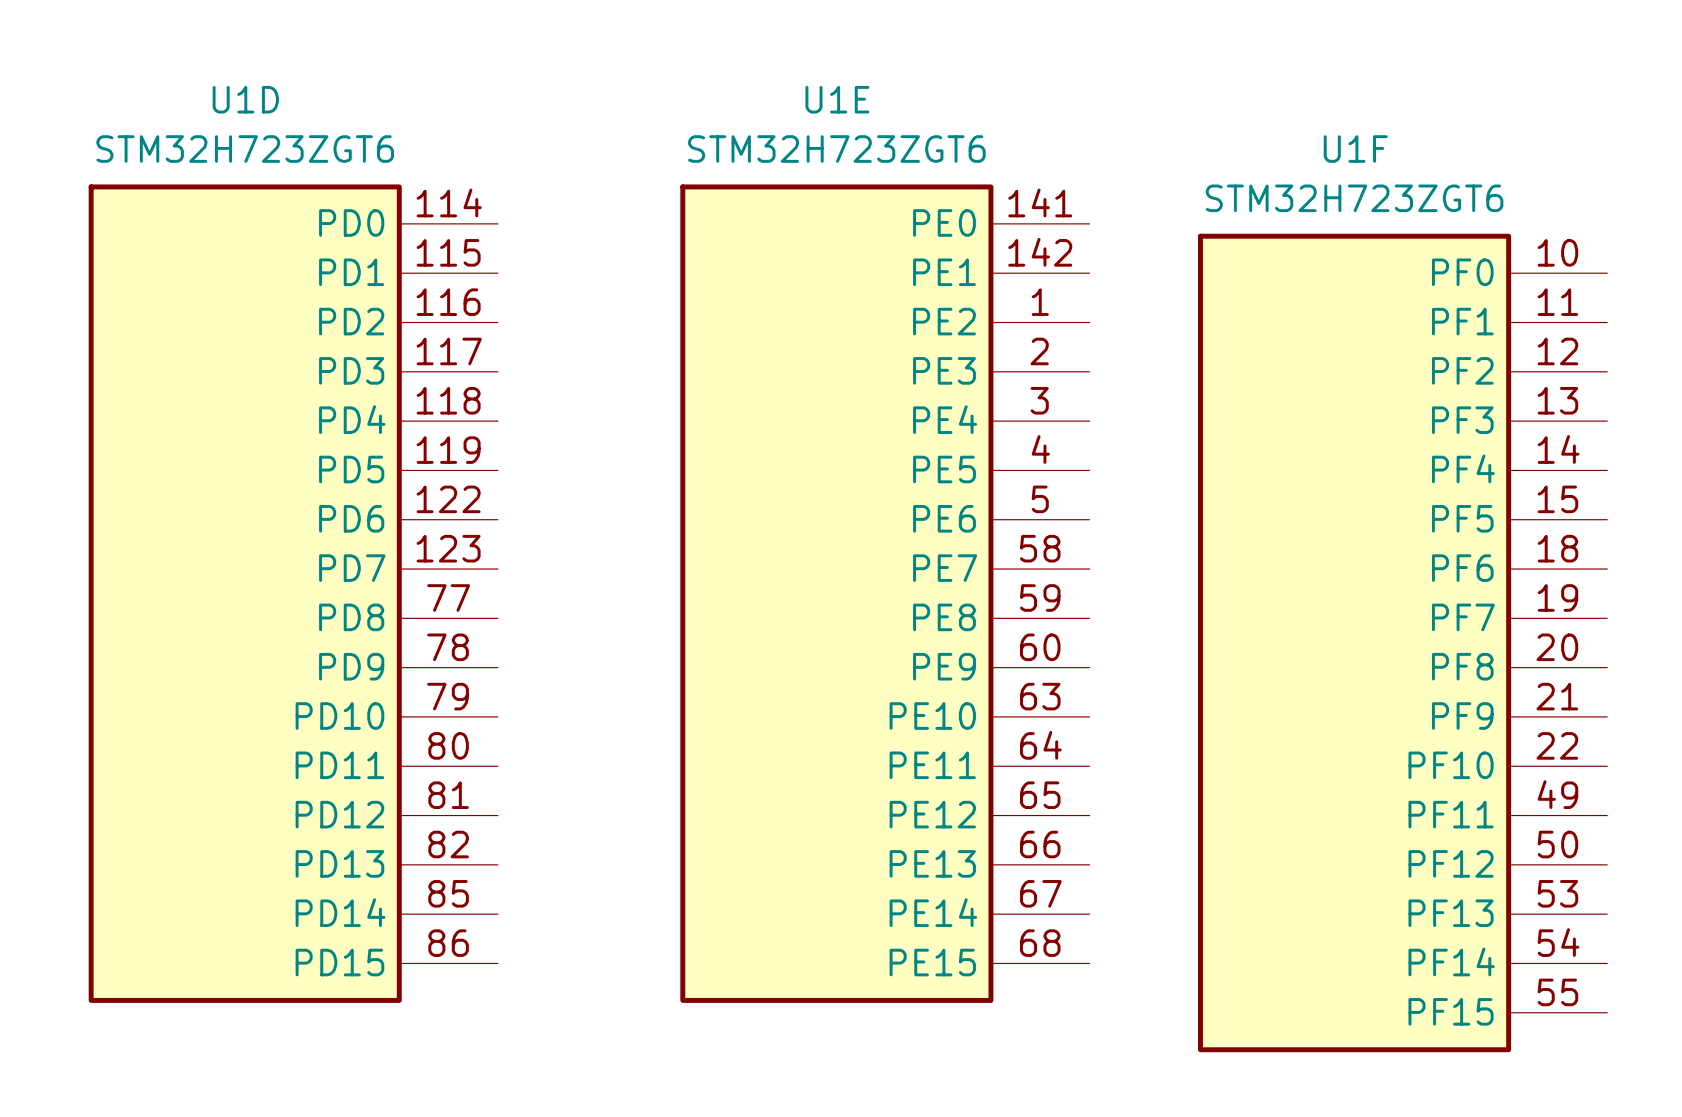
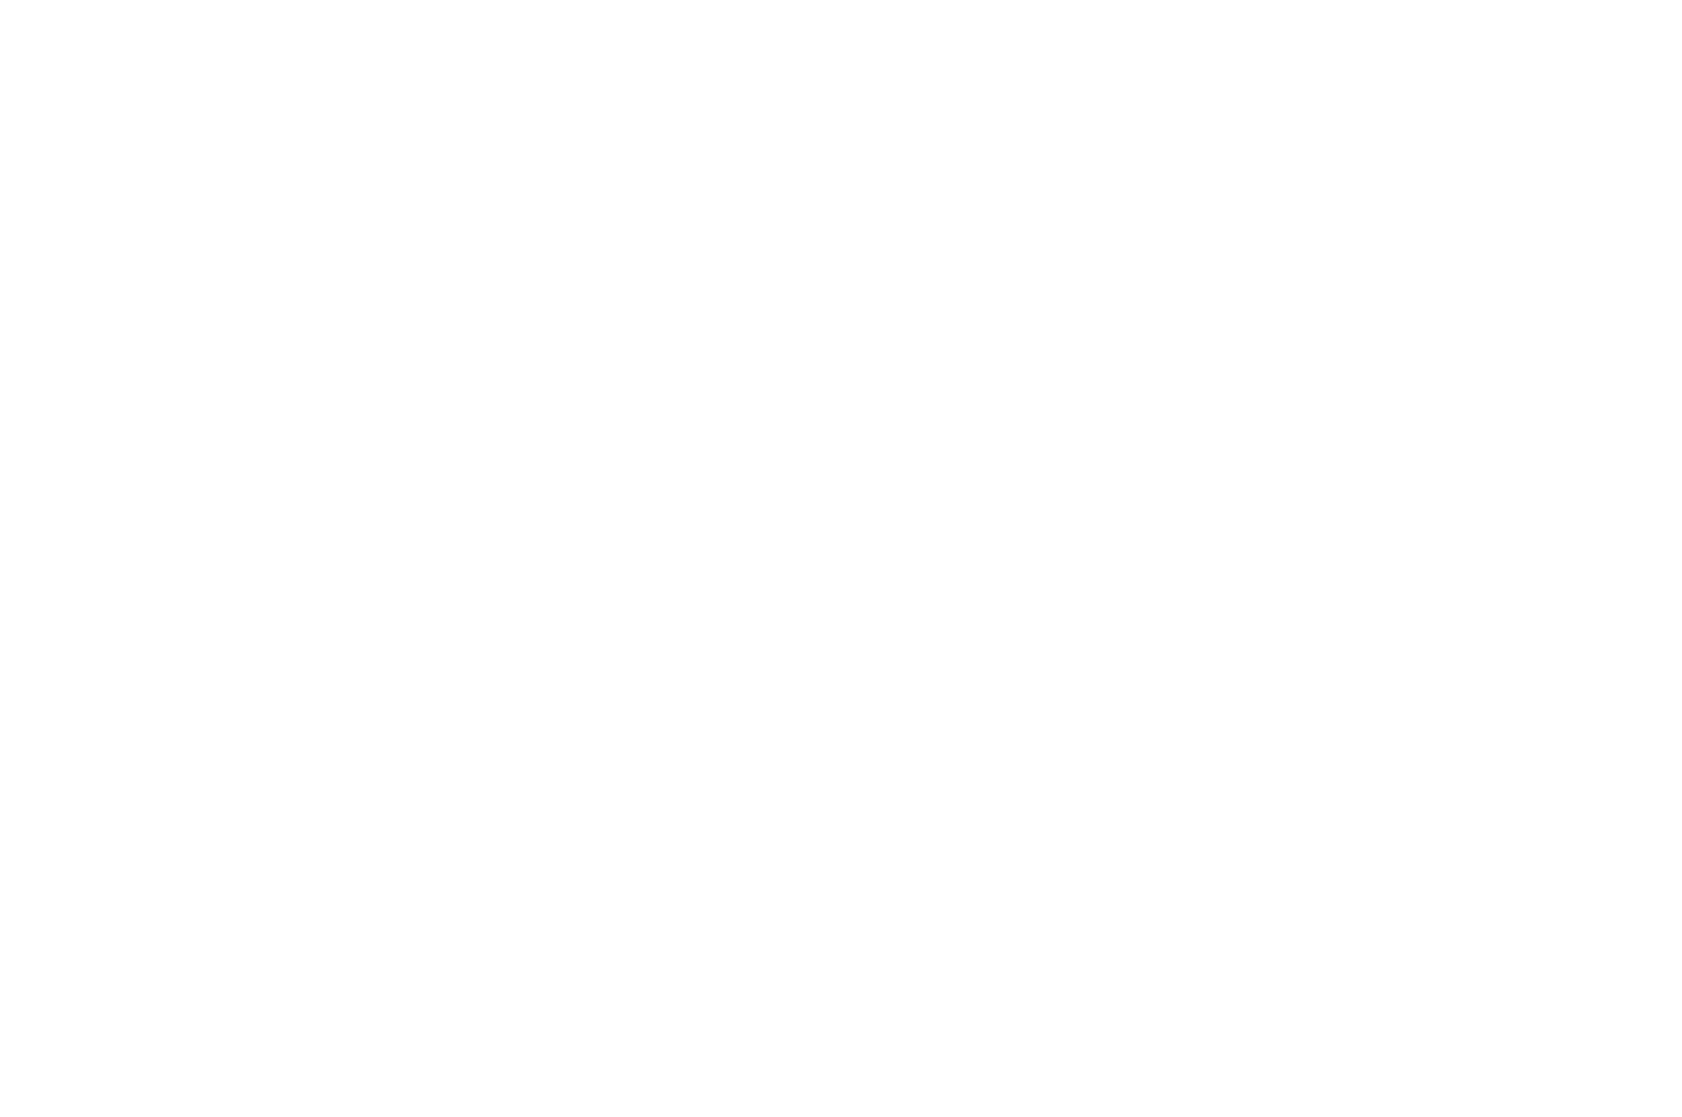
U1D: STM32H723ZGT6 (293, 593) -> none
U1E: STM32H723ZGT6 (884, 593) -> none
U1F: STM32H723ZGT6 (1402, 642) -> none

